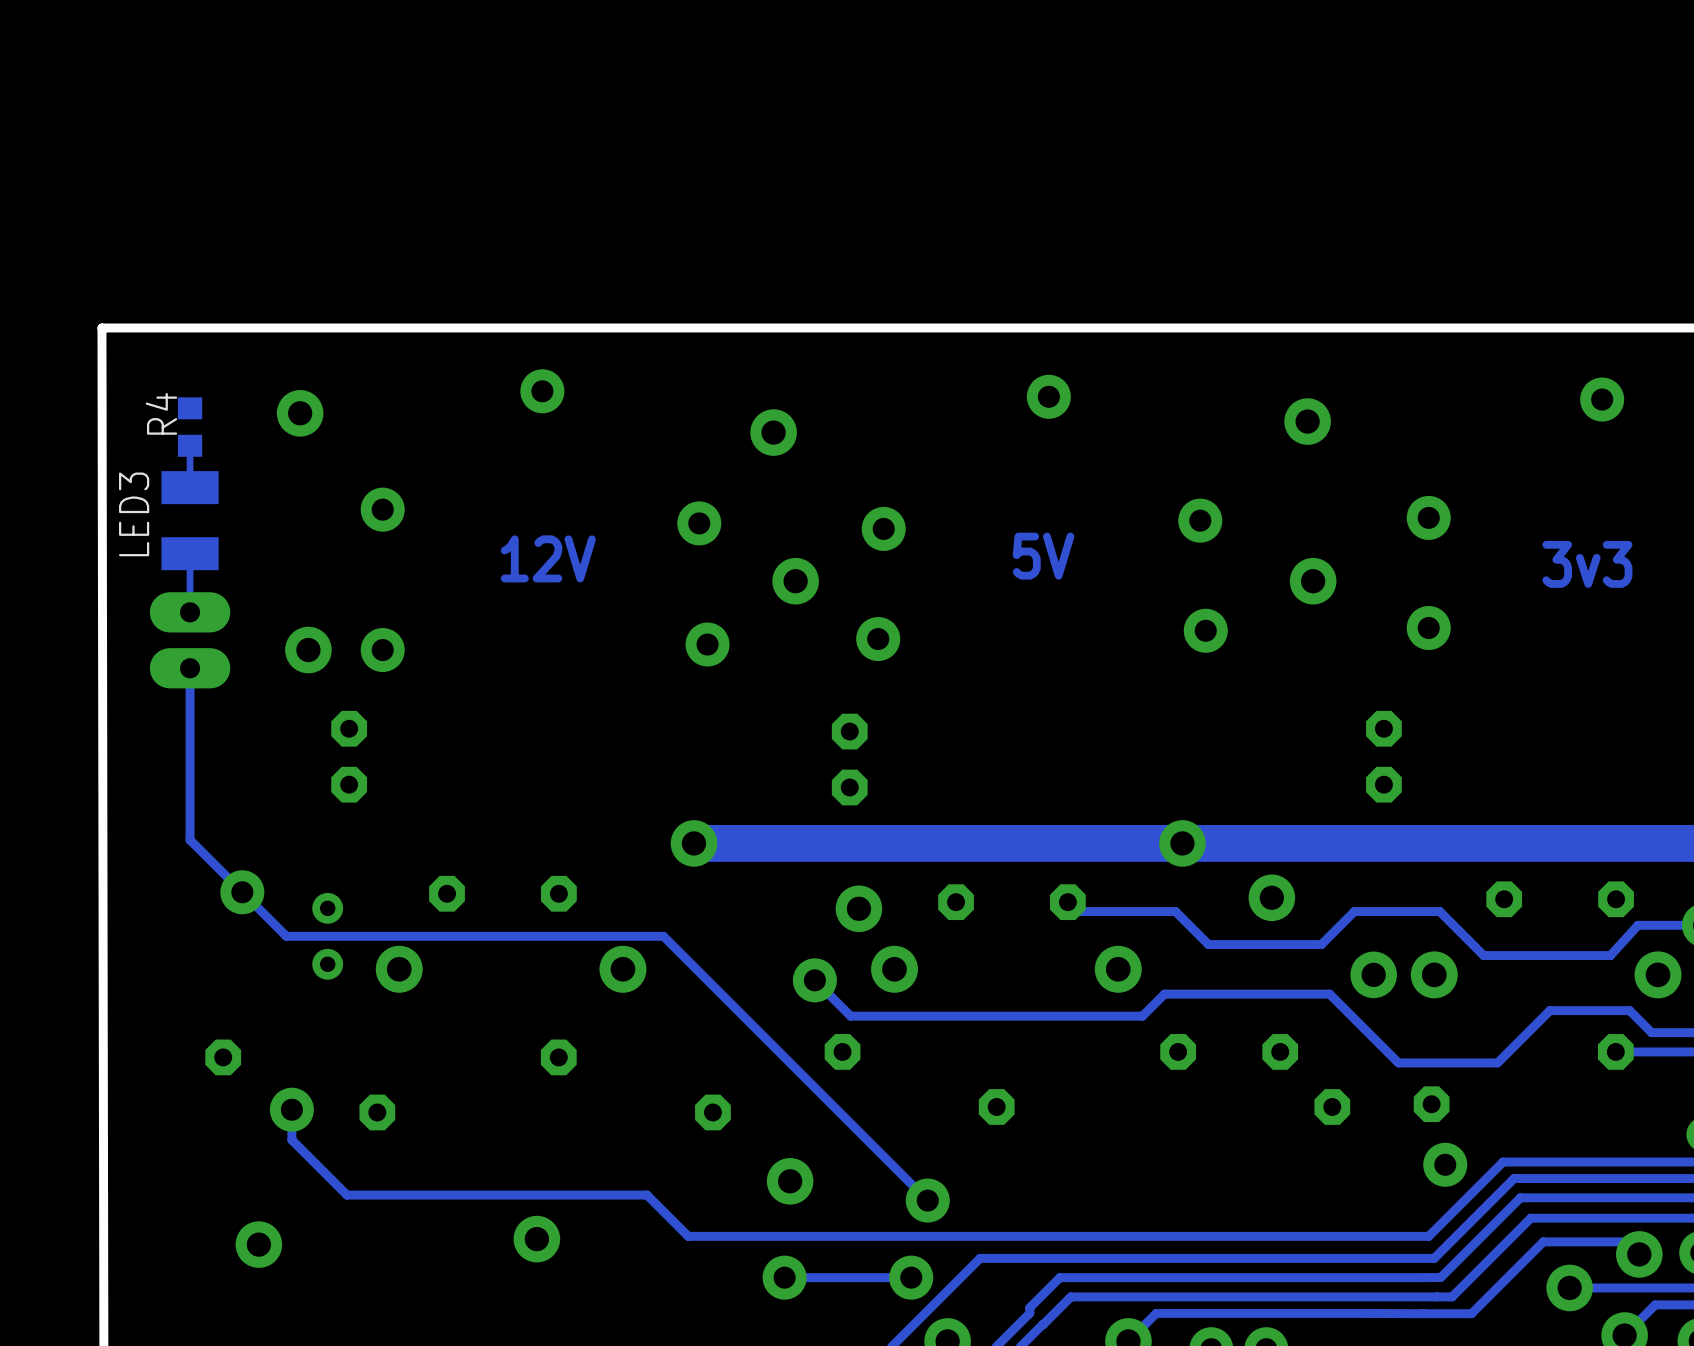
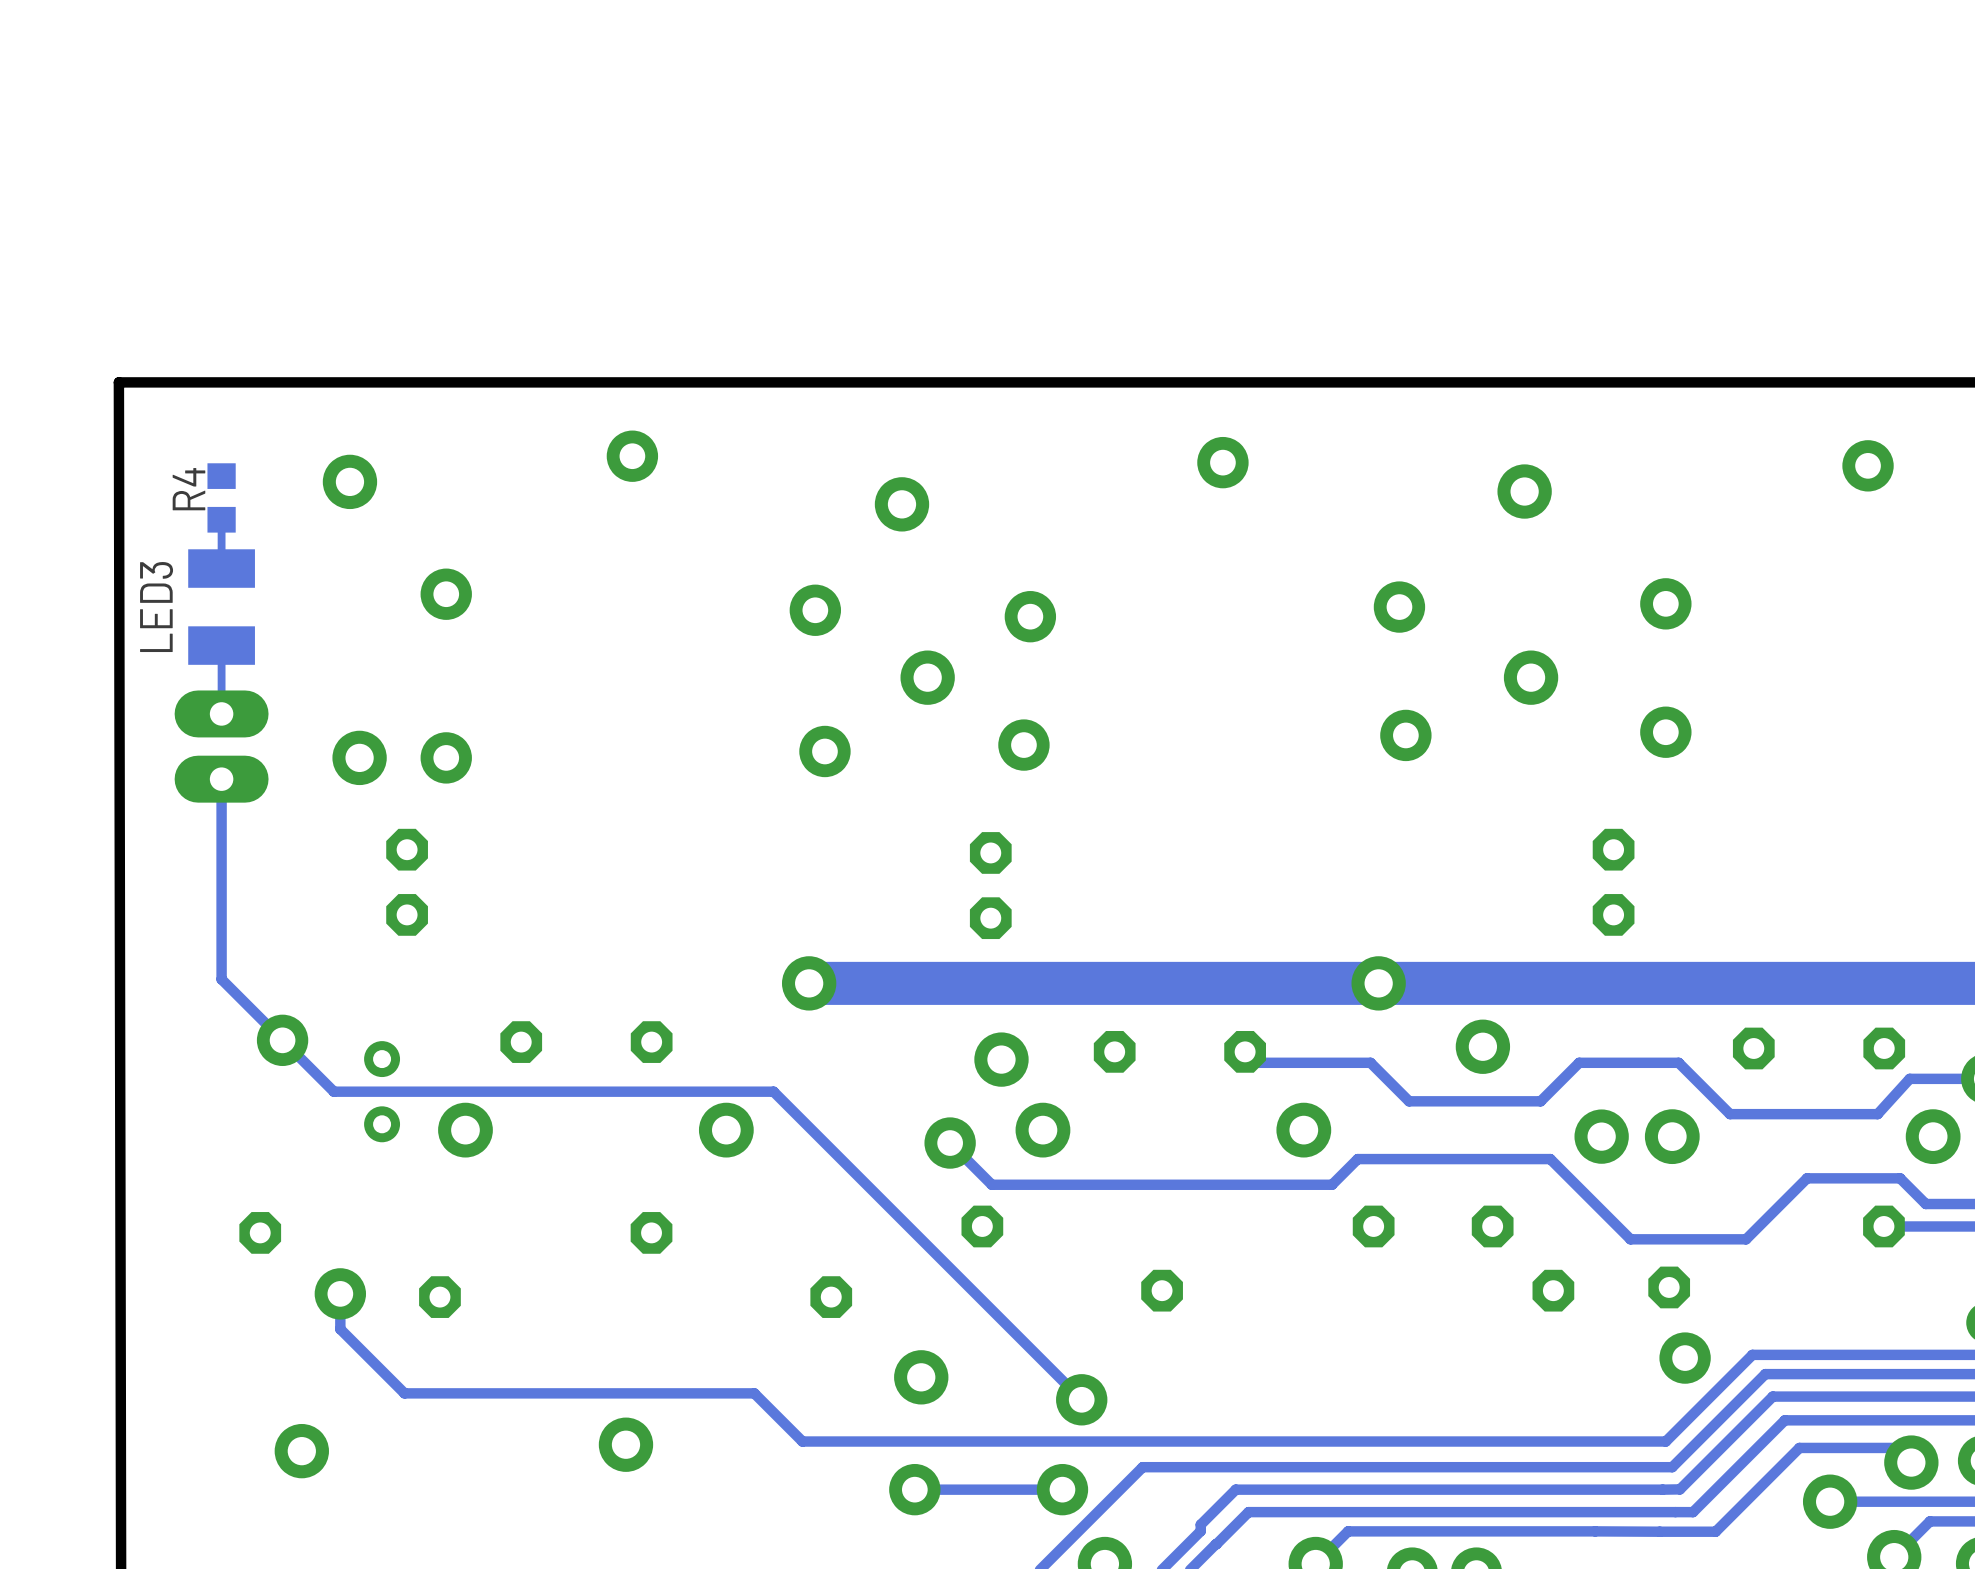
text: 5V (1043, 556) -> none
text: 12V (548, 558) -> none
text: 3v3 (1587, 564) -> none

